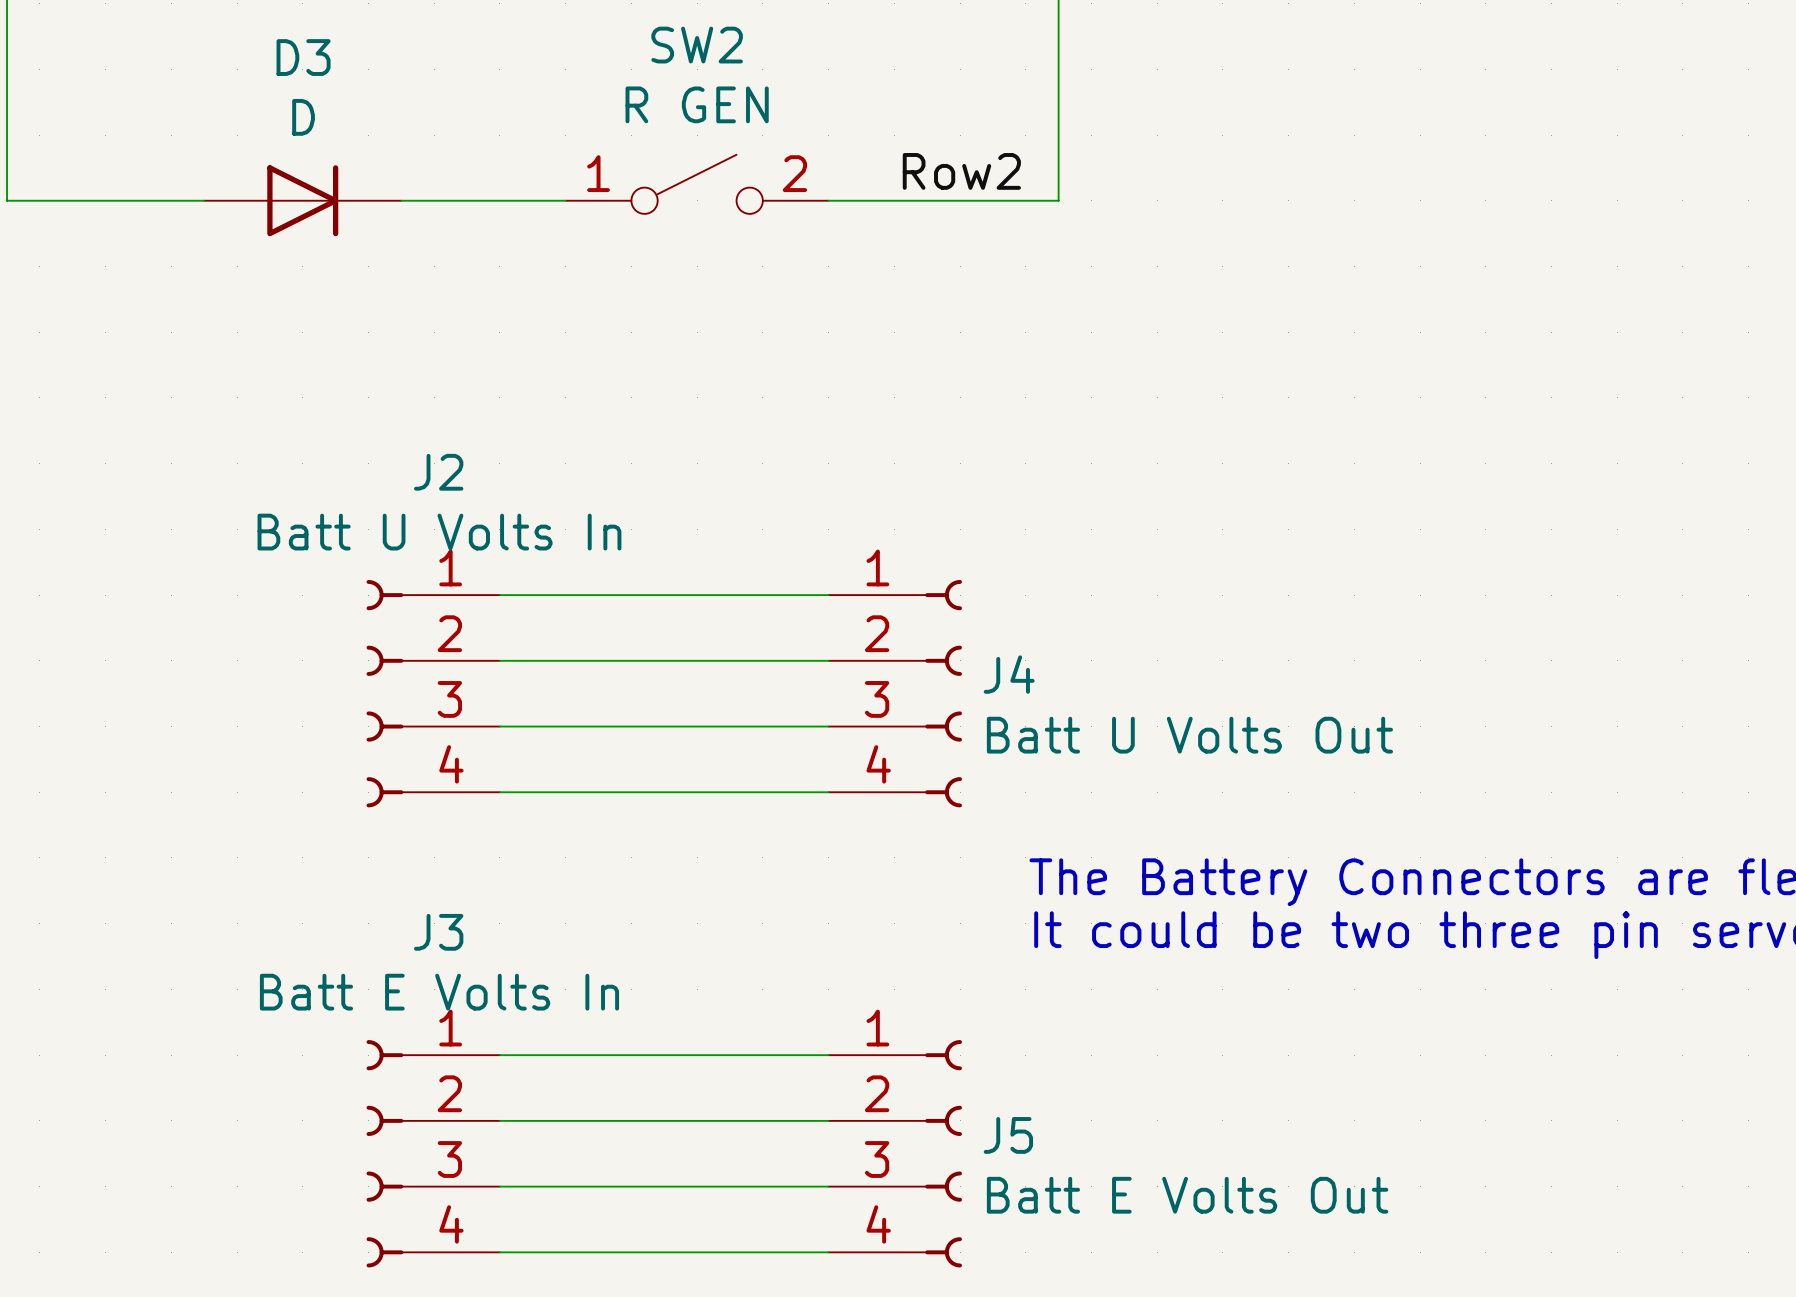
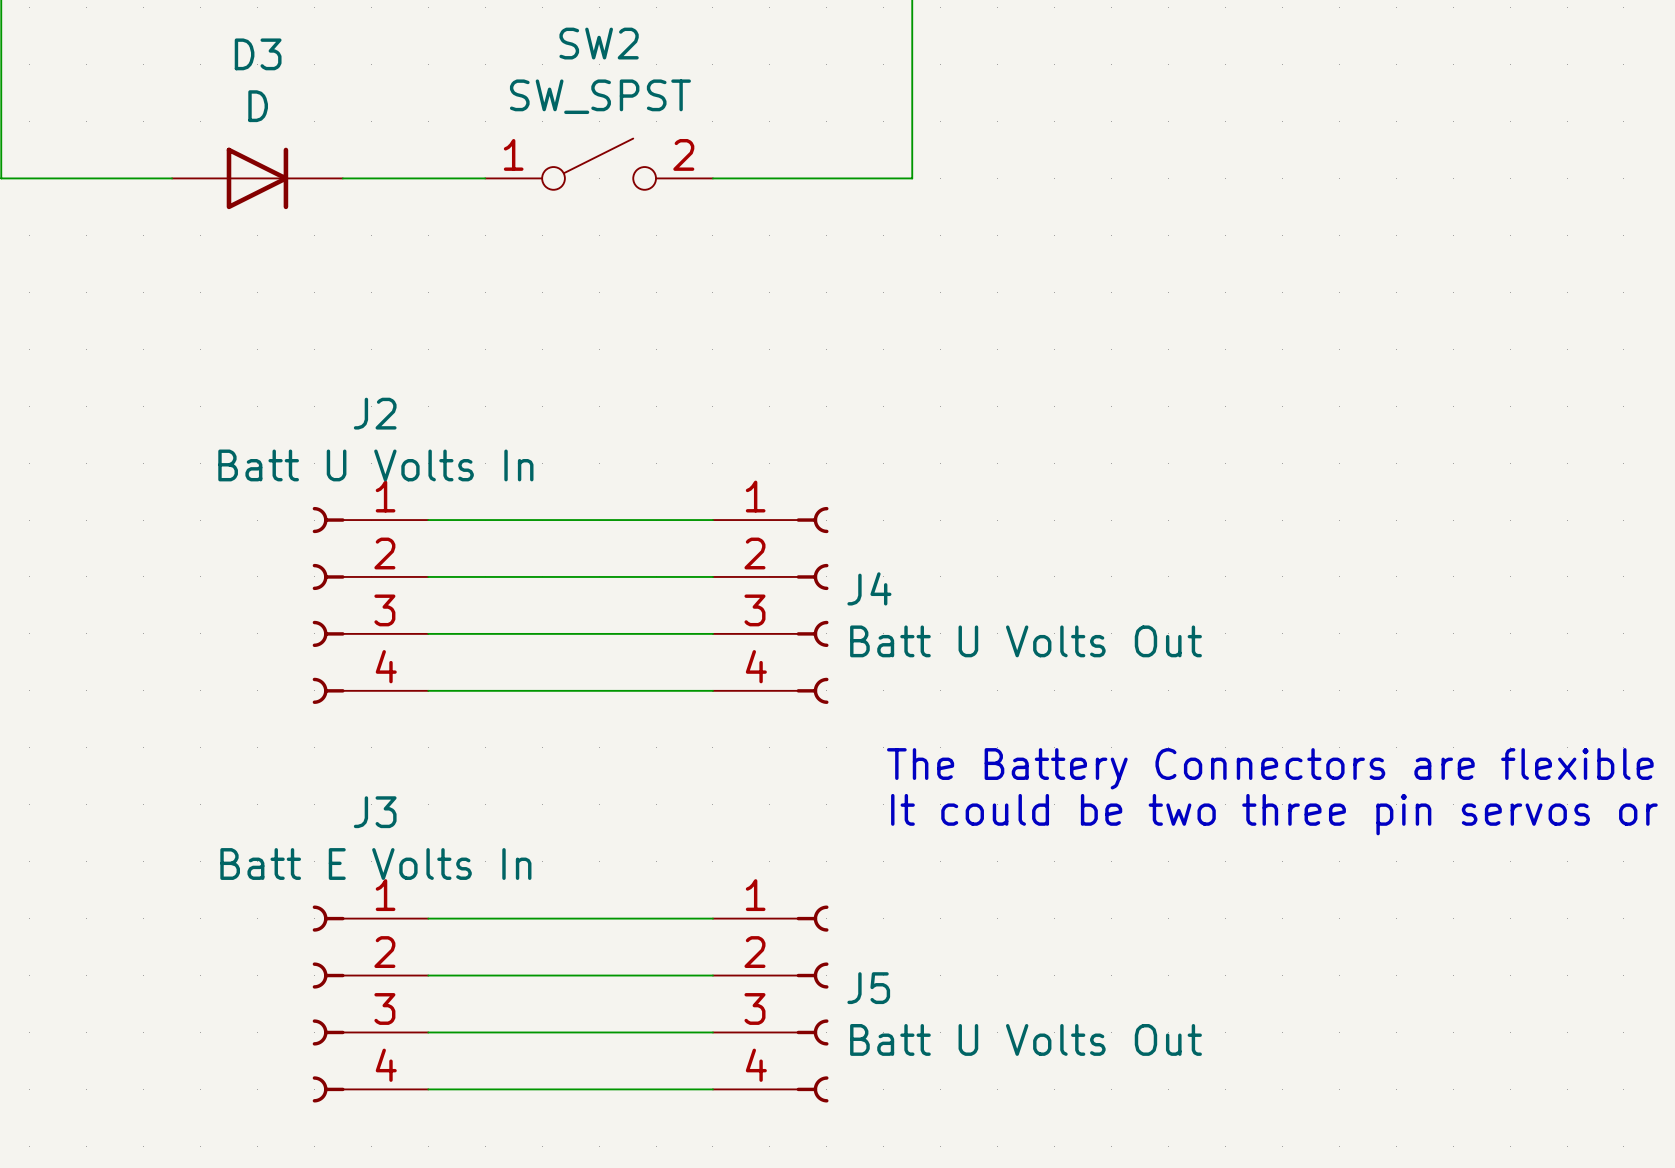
SW2 value: R GEN (697, 104) -> SW_SPST (600, 96)
label: Row2 (961, 171) -> none
J5 value: Batt E Volts Out (1187, 1195) -> Batt U Volts Out (1025, 1039)

